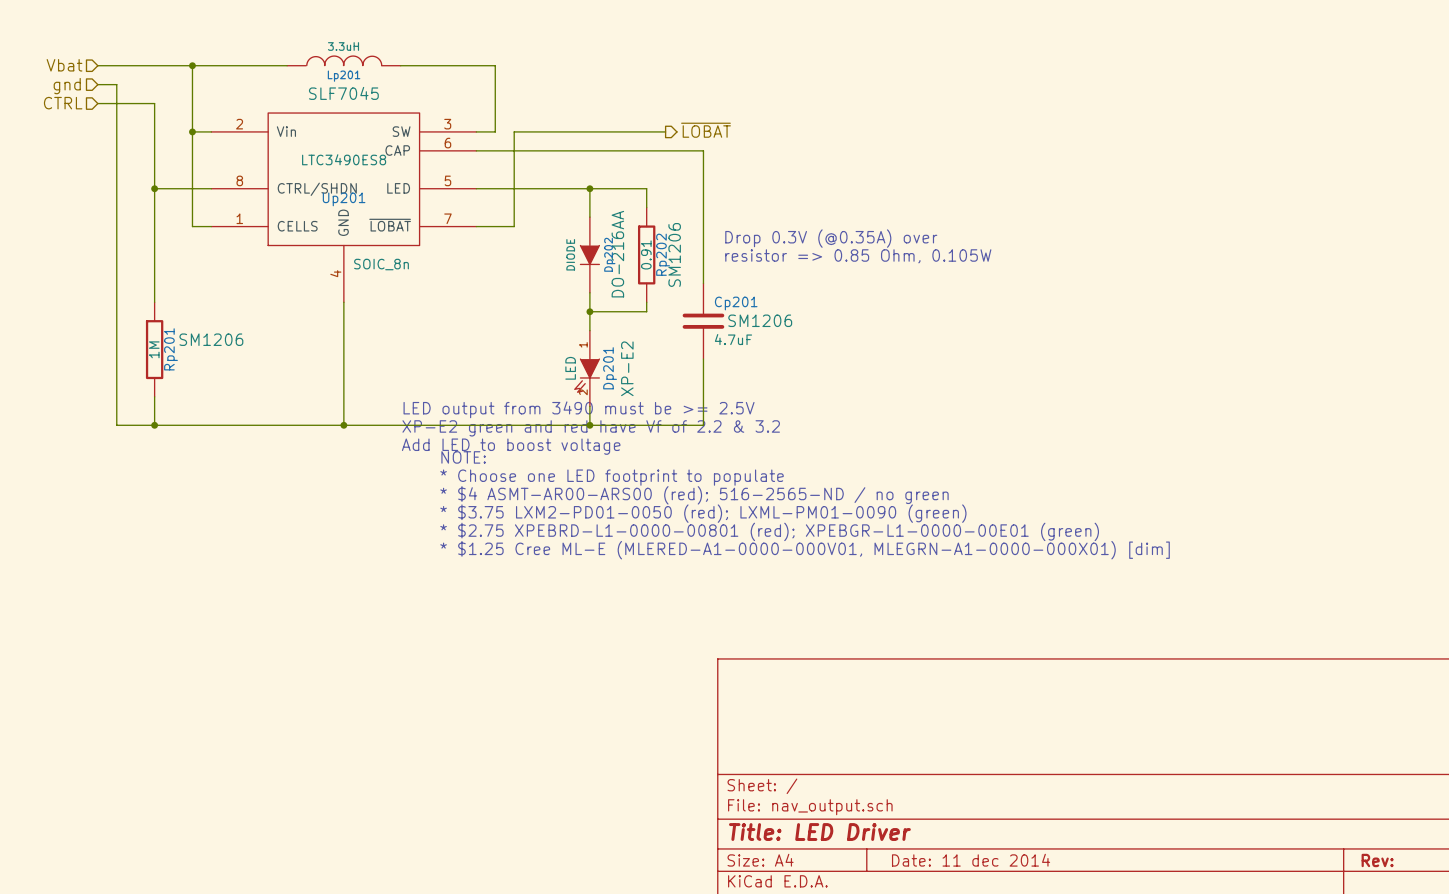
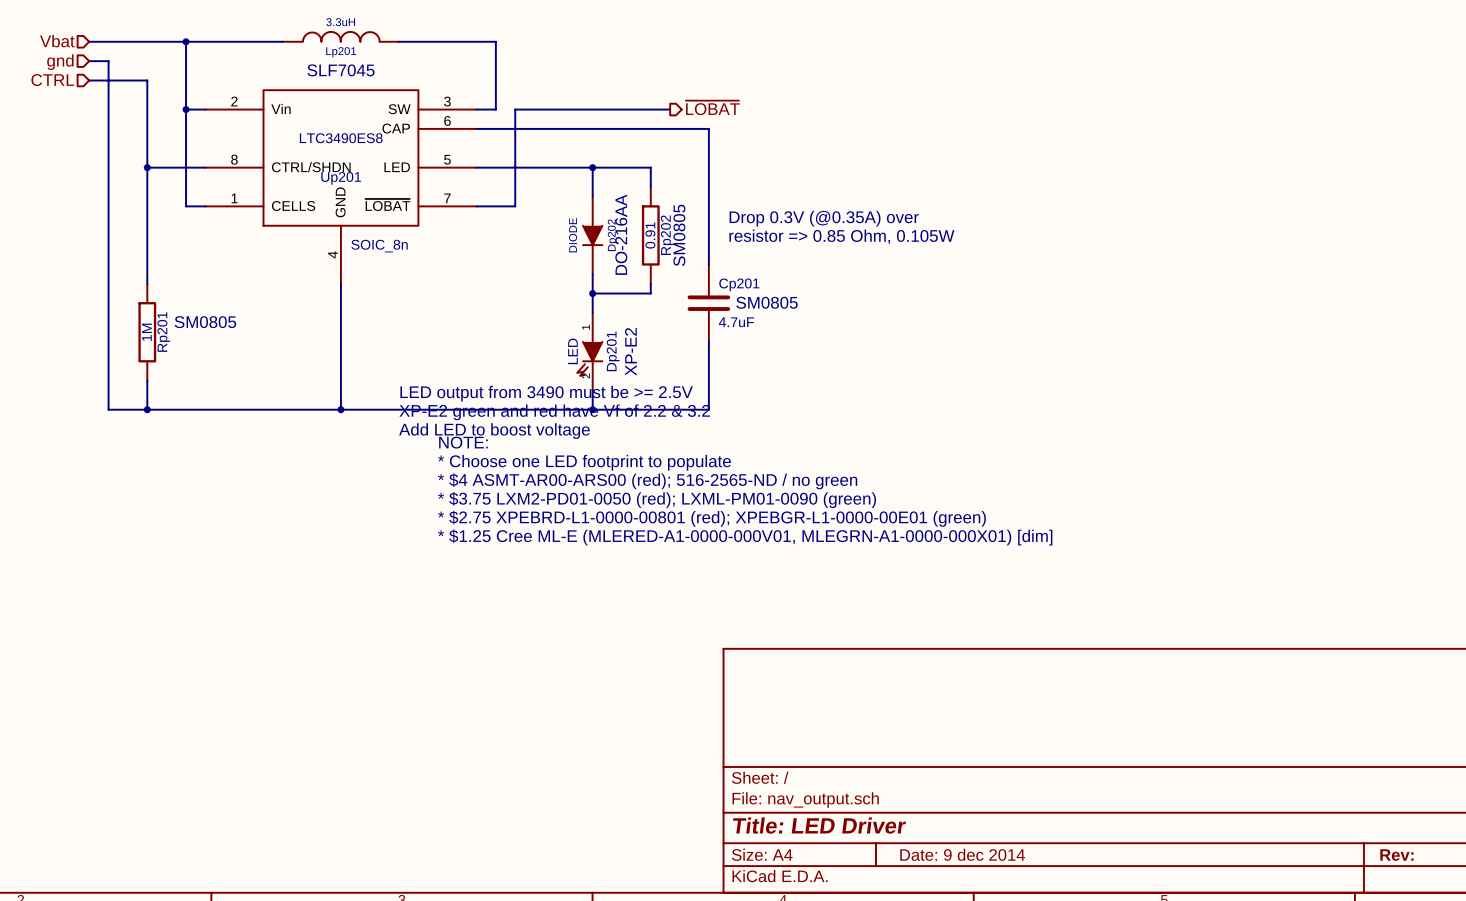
Rp202 text: SM1206 (674, 254) -> SM0805 (679, 235)
Cp201 text: SM1206 (760, 320) -> SM0805 (767, 302)
Rp201 text: SM1206 (211, 339) -> SM0805 (205, 322)
title block: Date: 11 dec 2014 (971, 860) -> Date: 9 dec 2014 (962, 854)

